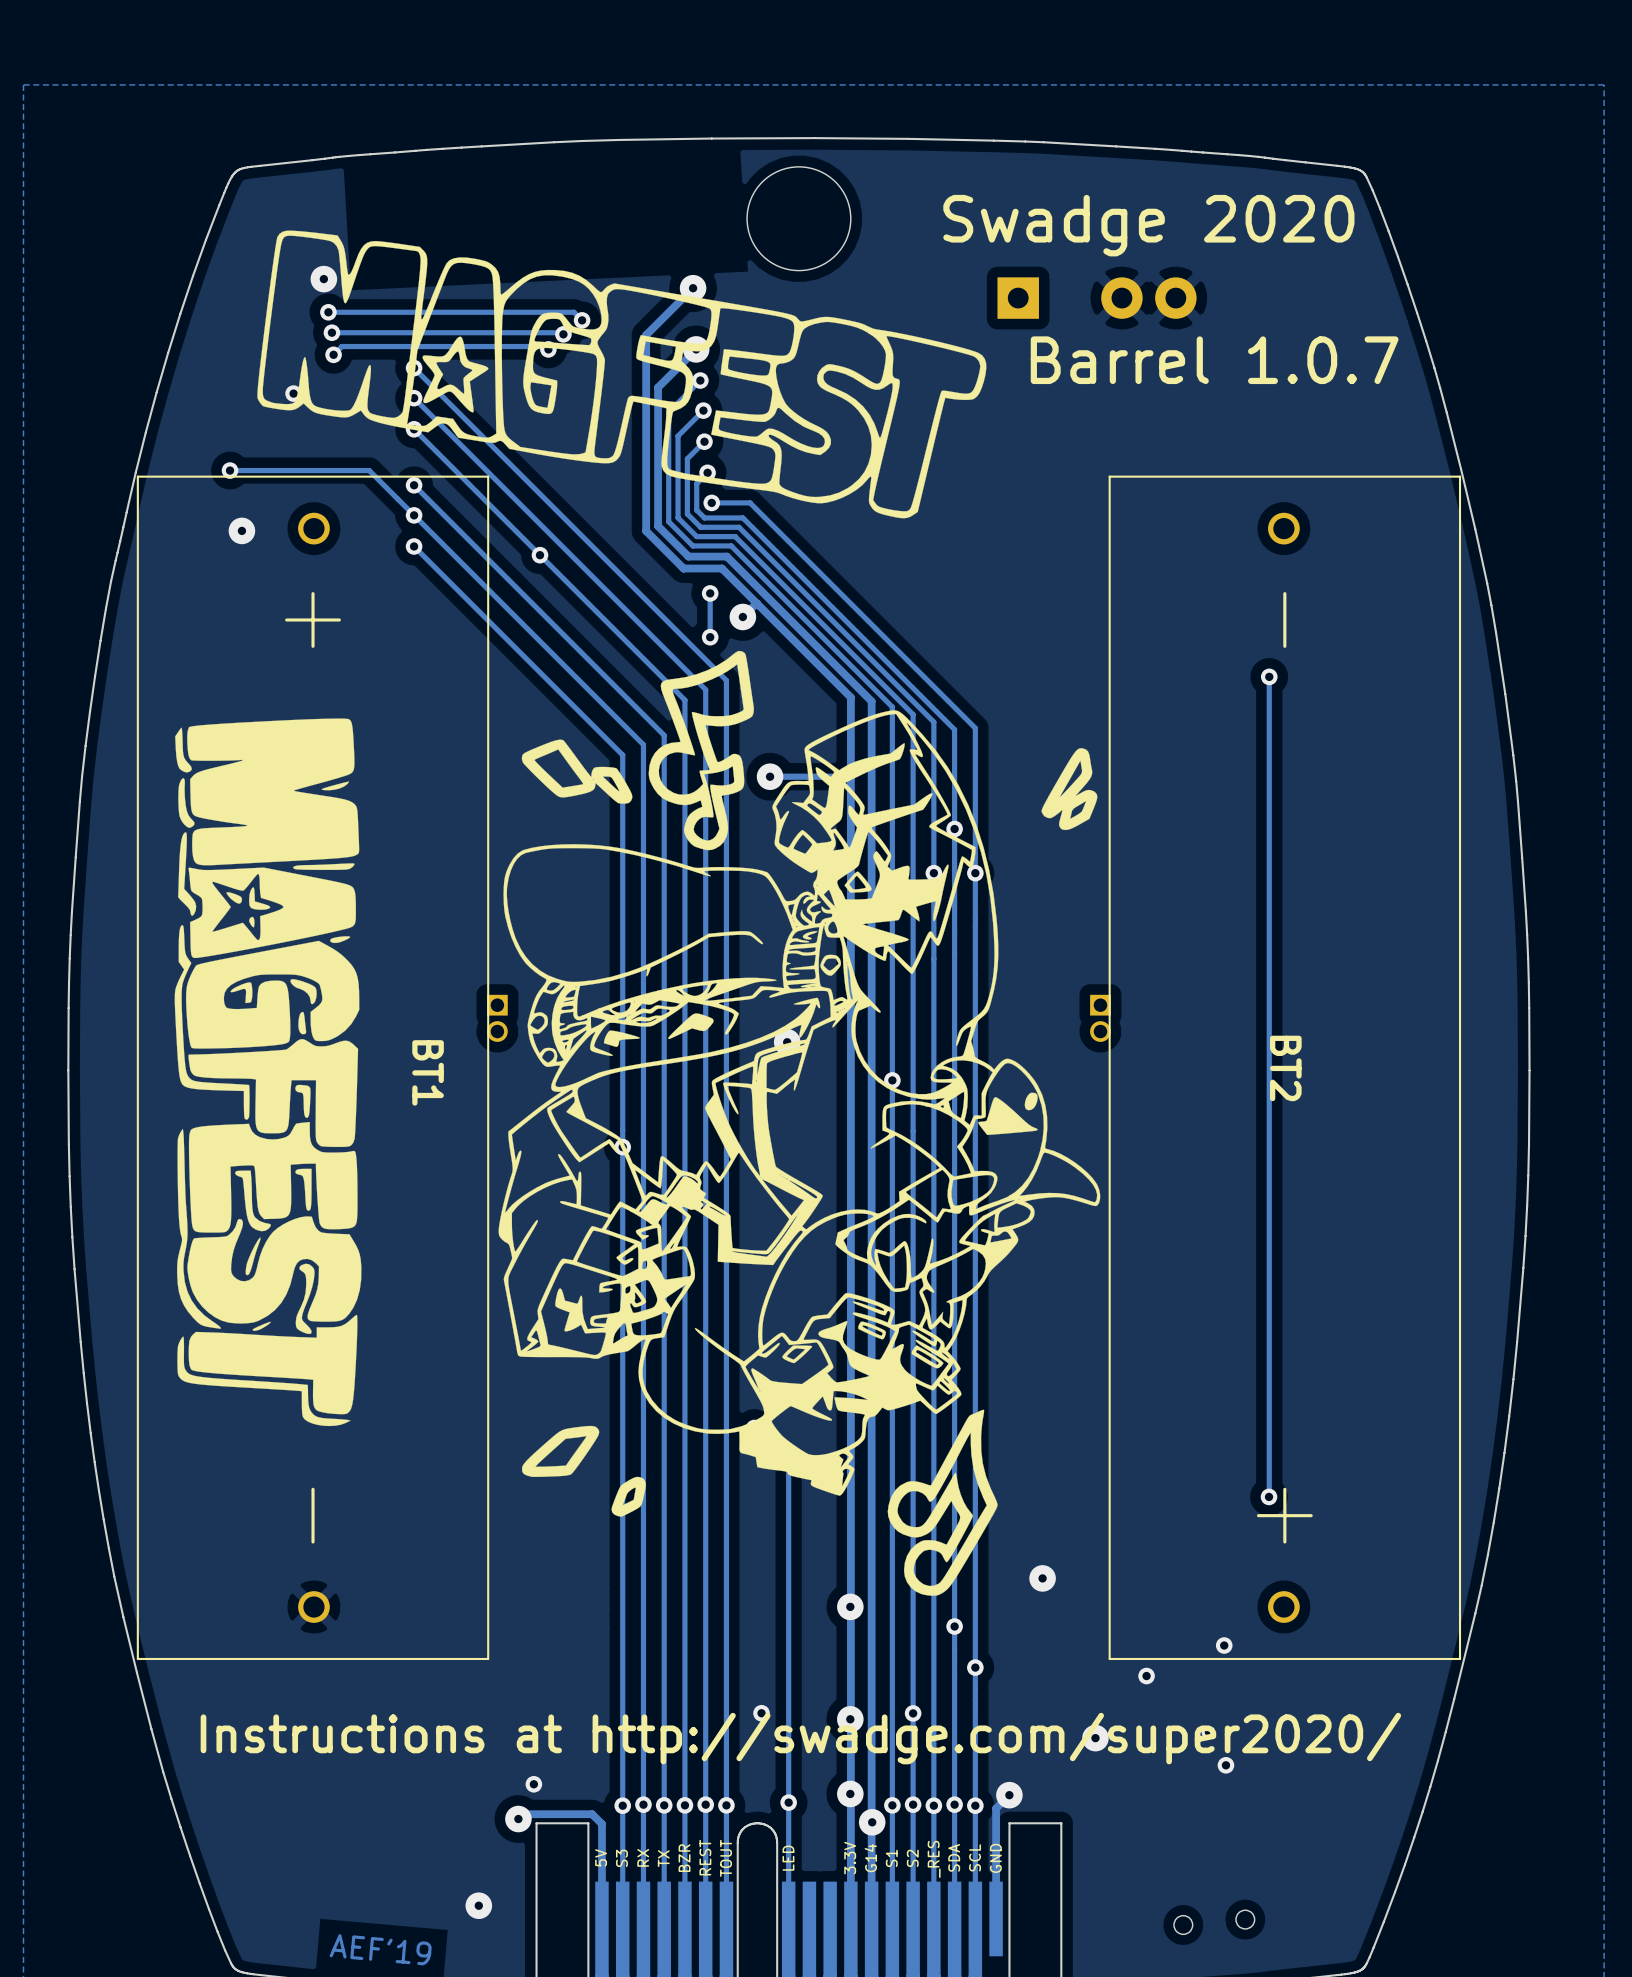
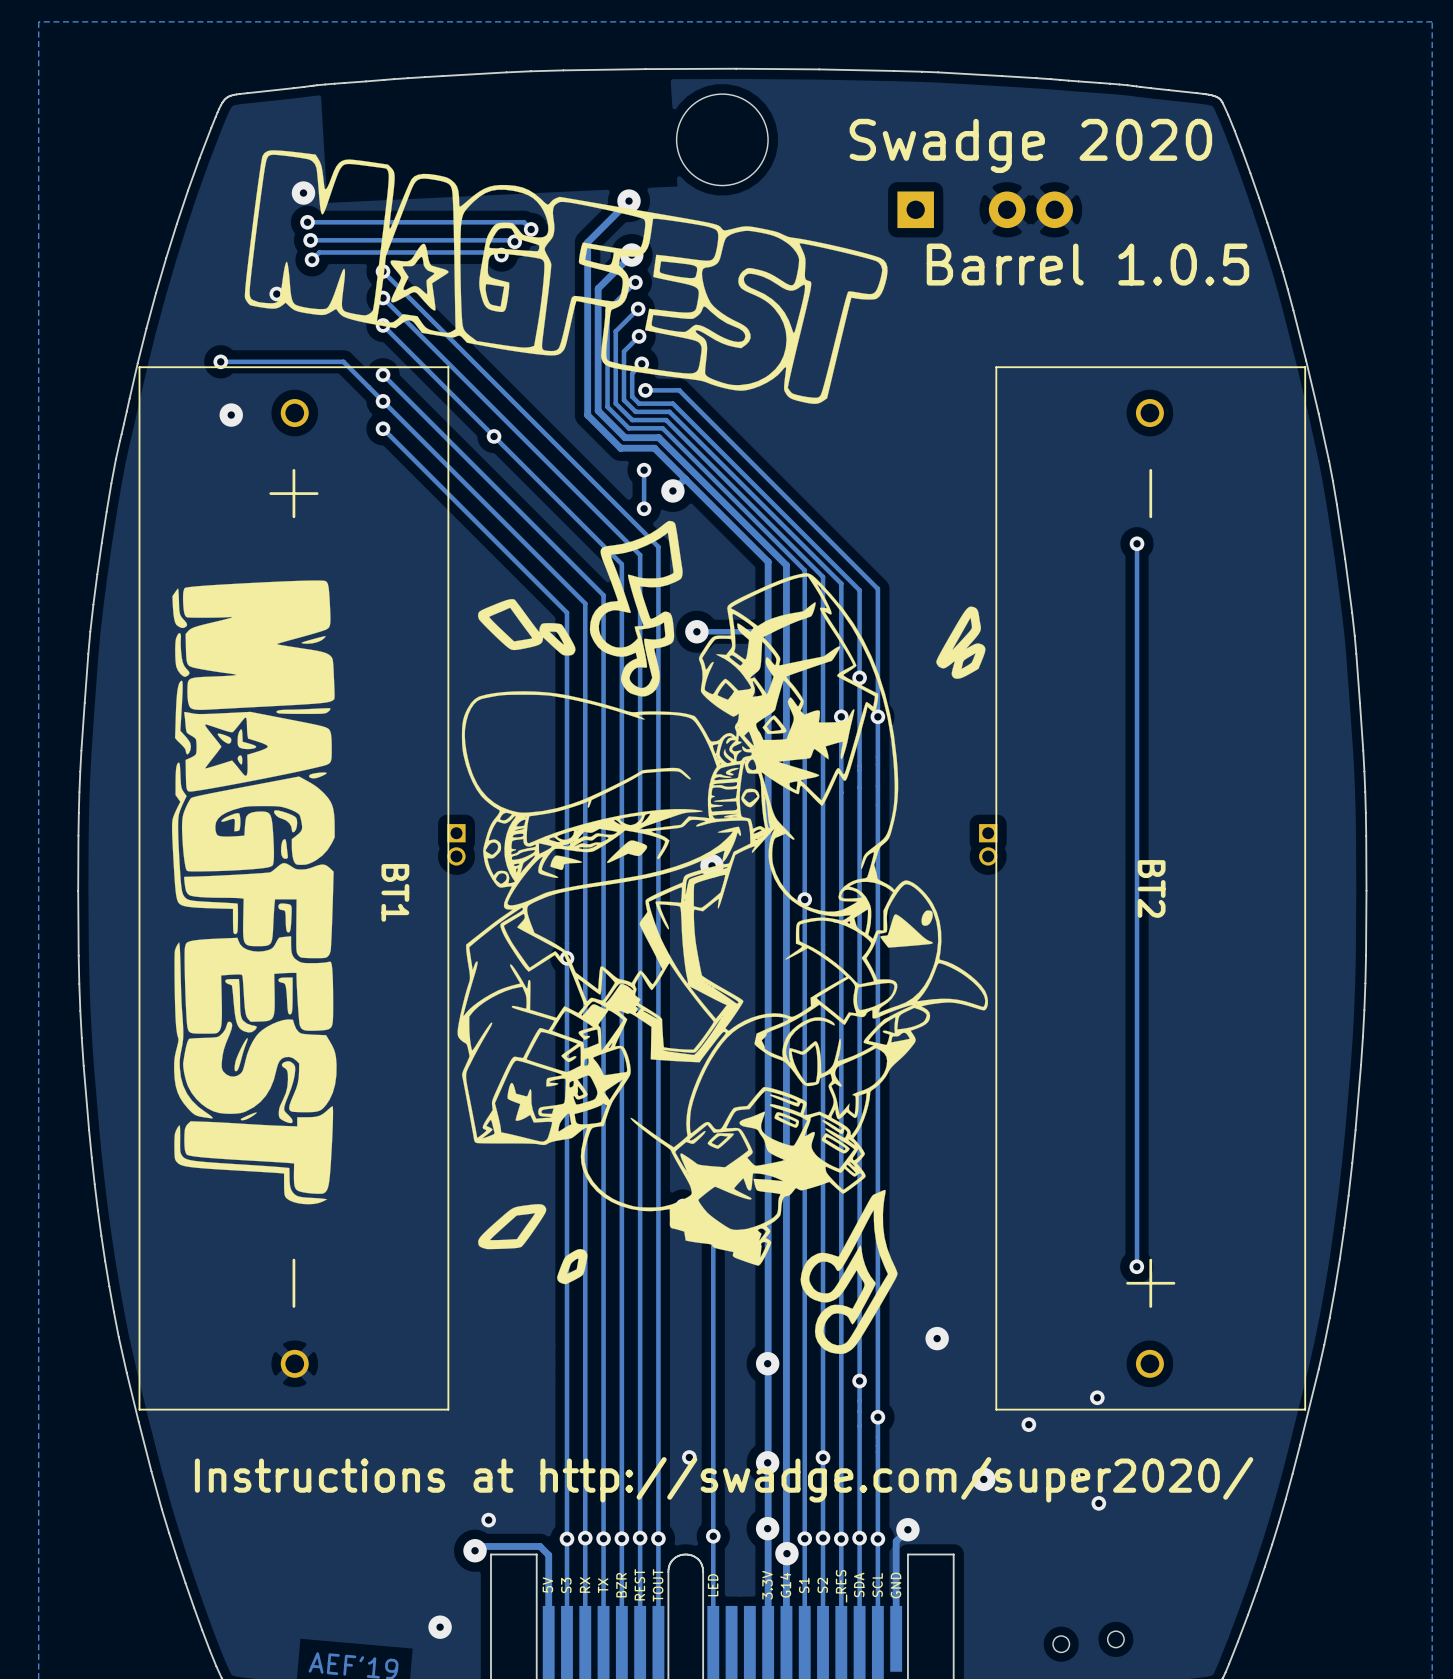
text: Barrel 1.0.7 (1214, 360) -> Barrel 1.0.5 (1087, 264)

